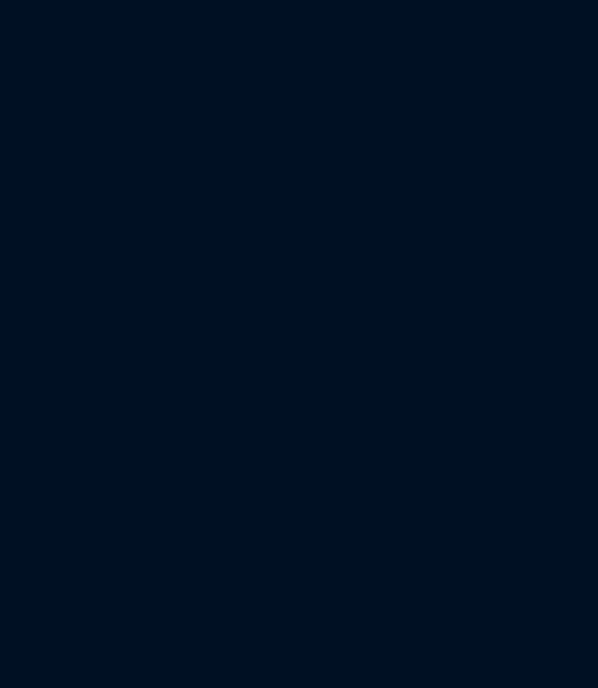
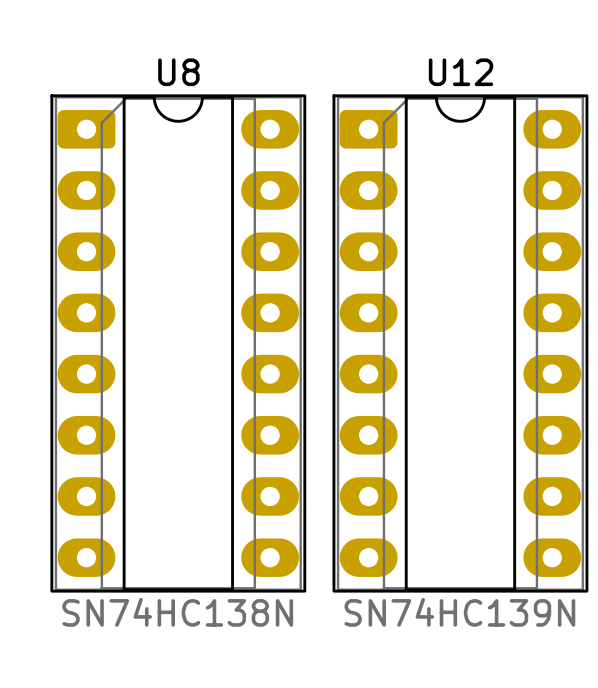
U8: none -> SN74HC138N (178, 343)
U12: none -> SN74HC139N (460, 343)

